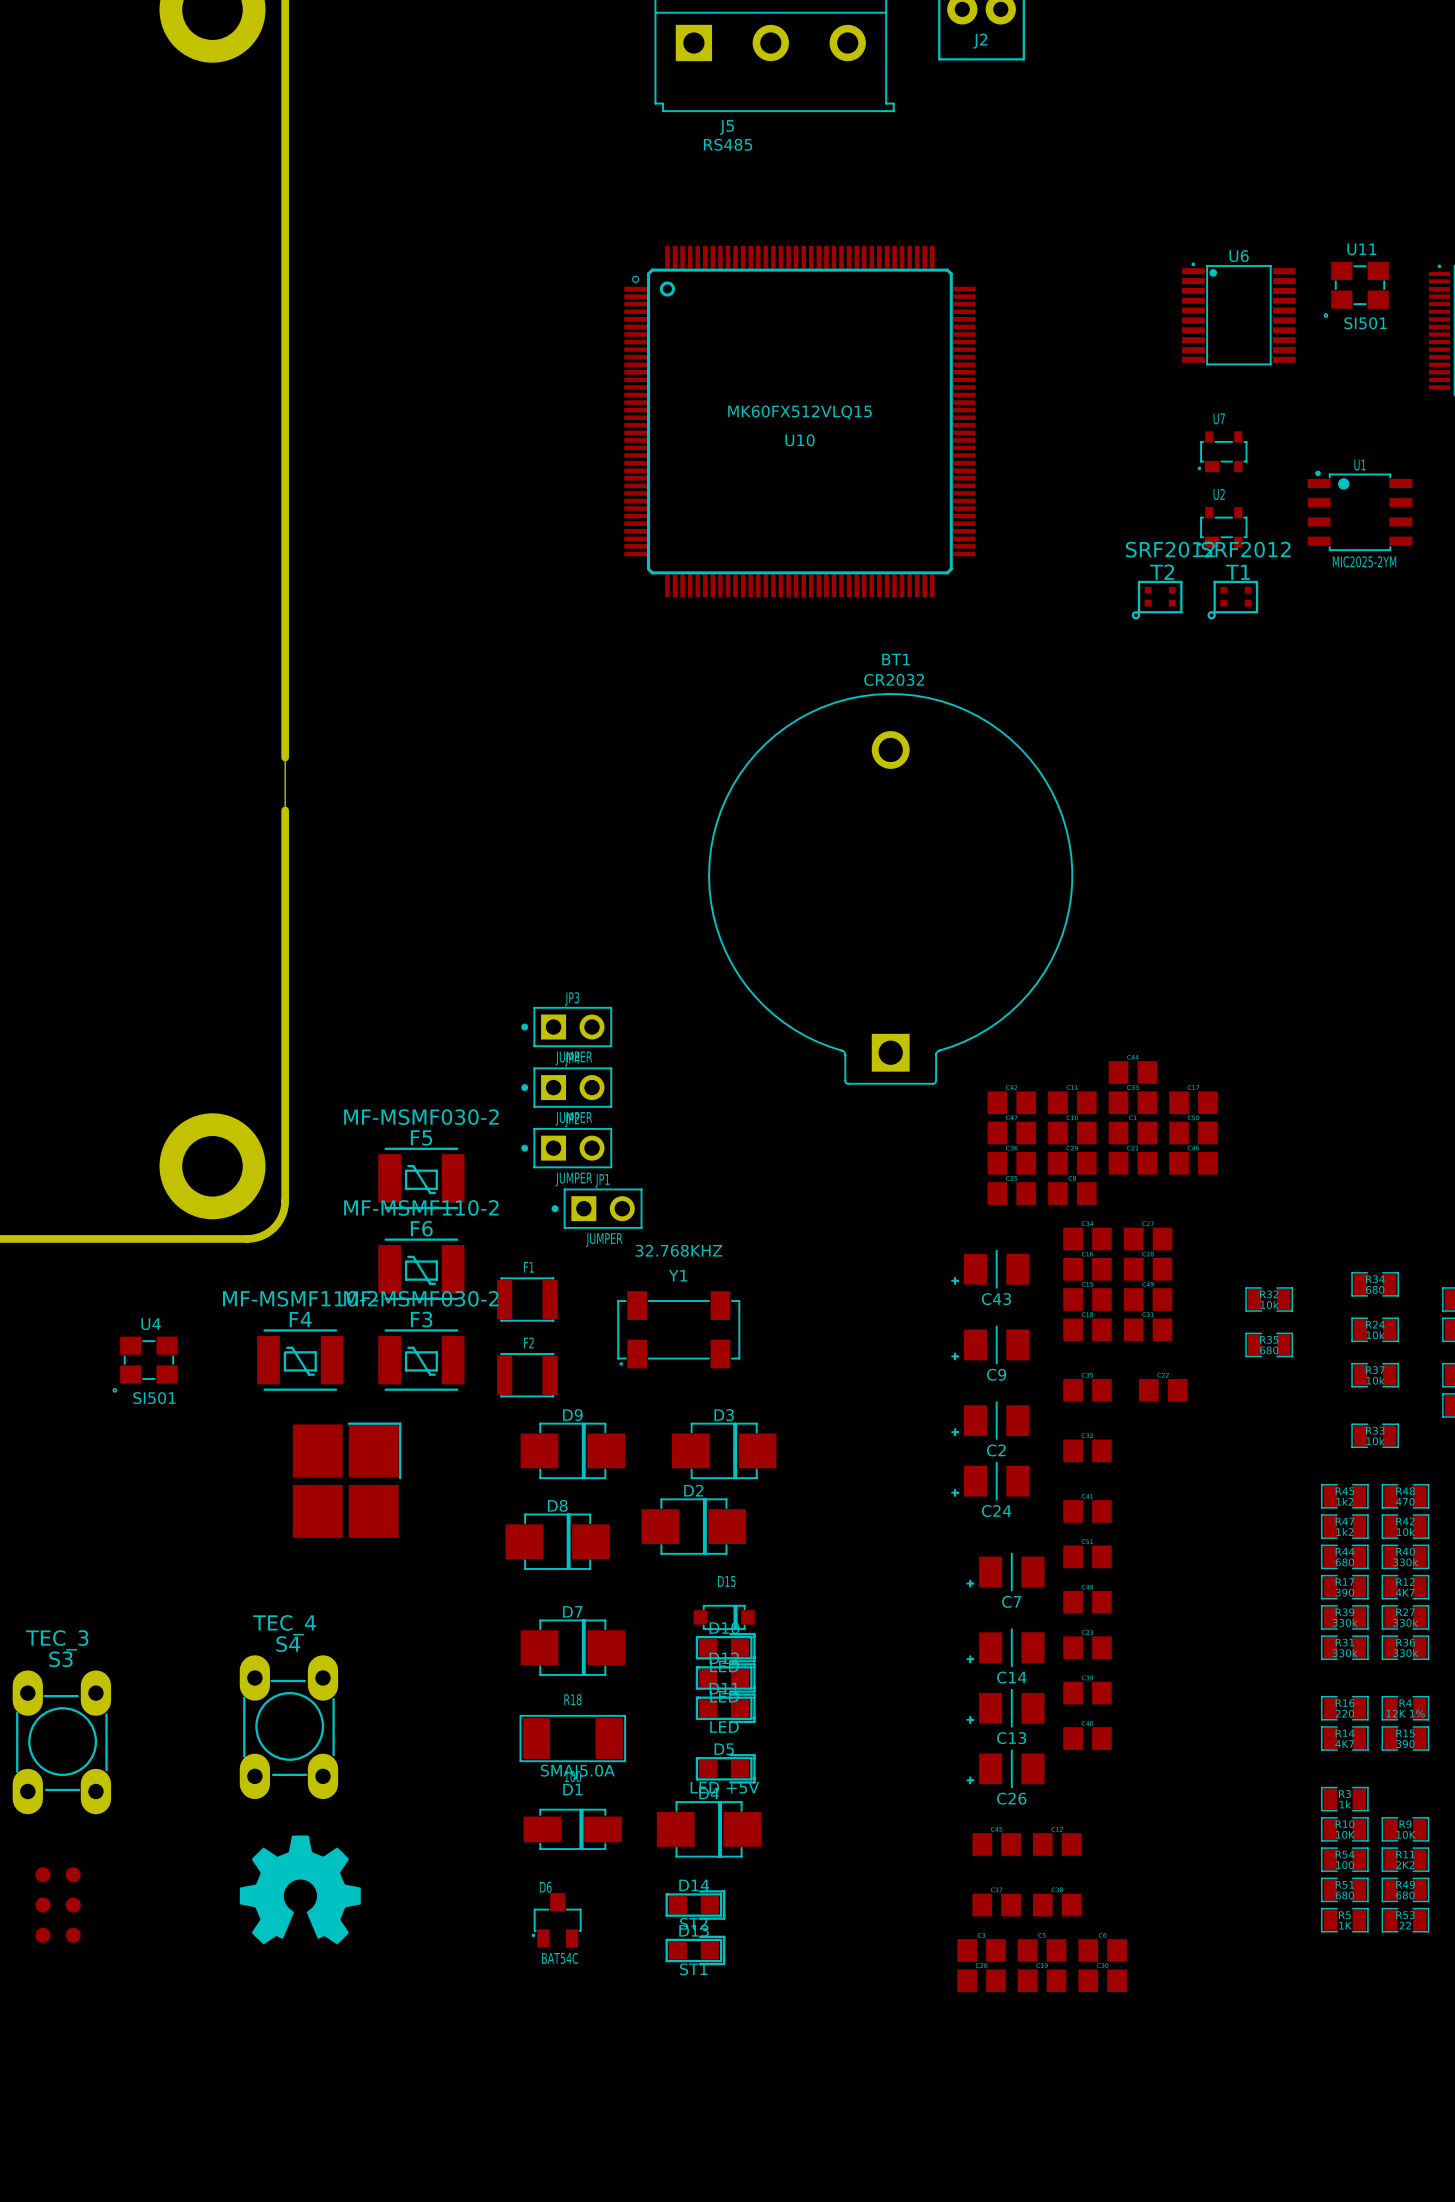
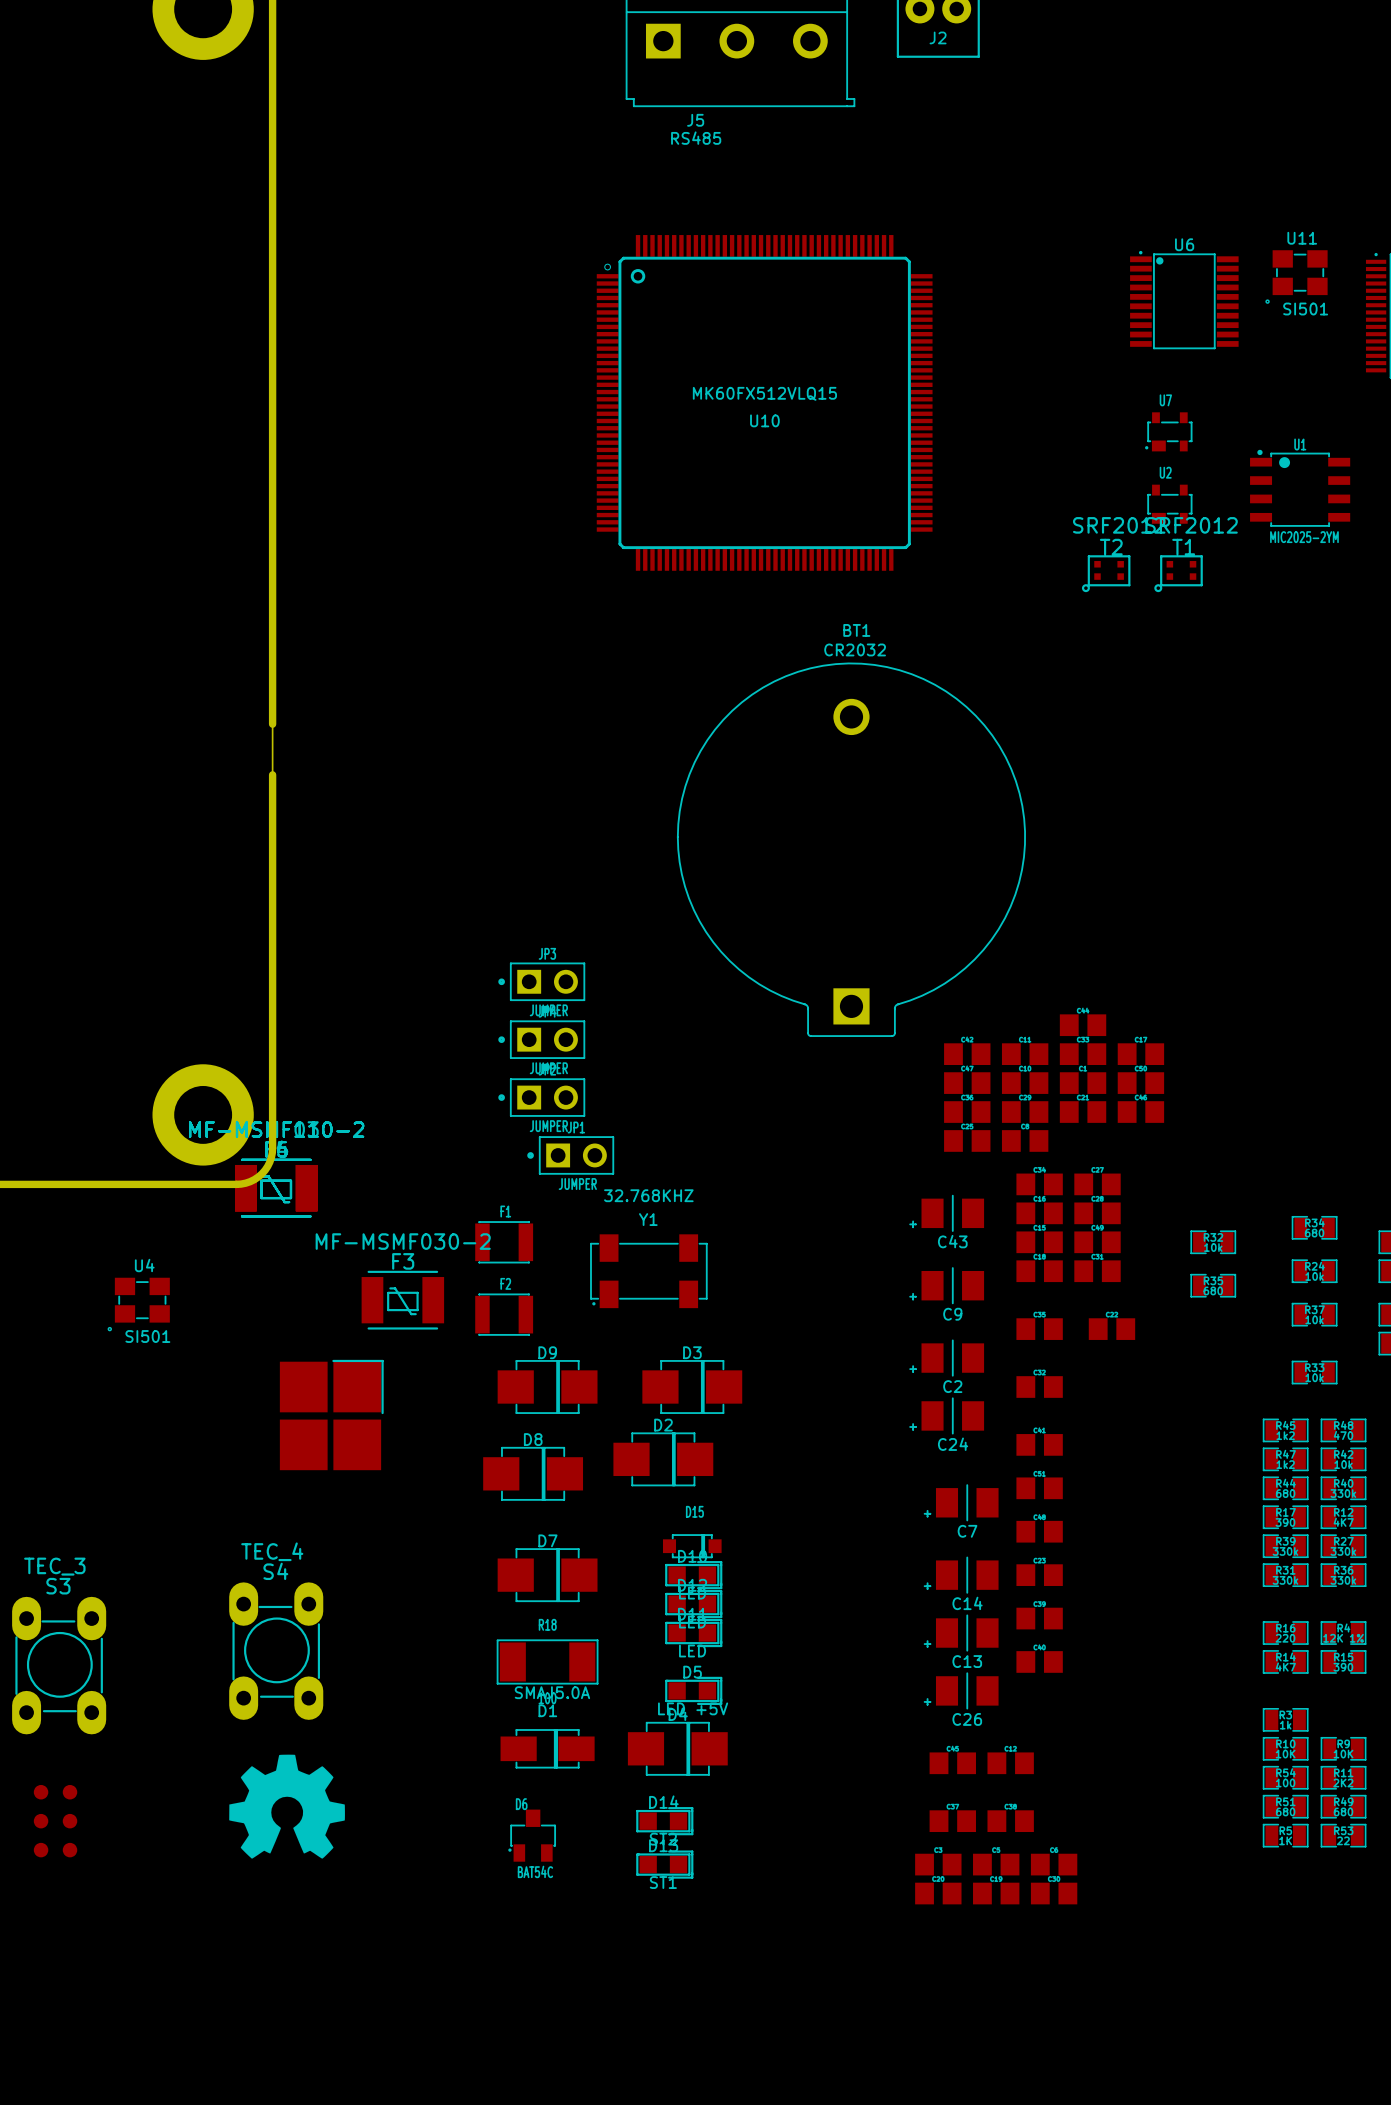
F5 position: (421, 1178) -> (276, 1188)
F6 position: (421, 1269) -> (276, 1188)
F4 position: (300, 1360) -> (276, 1188)

